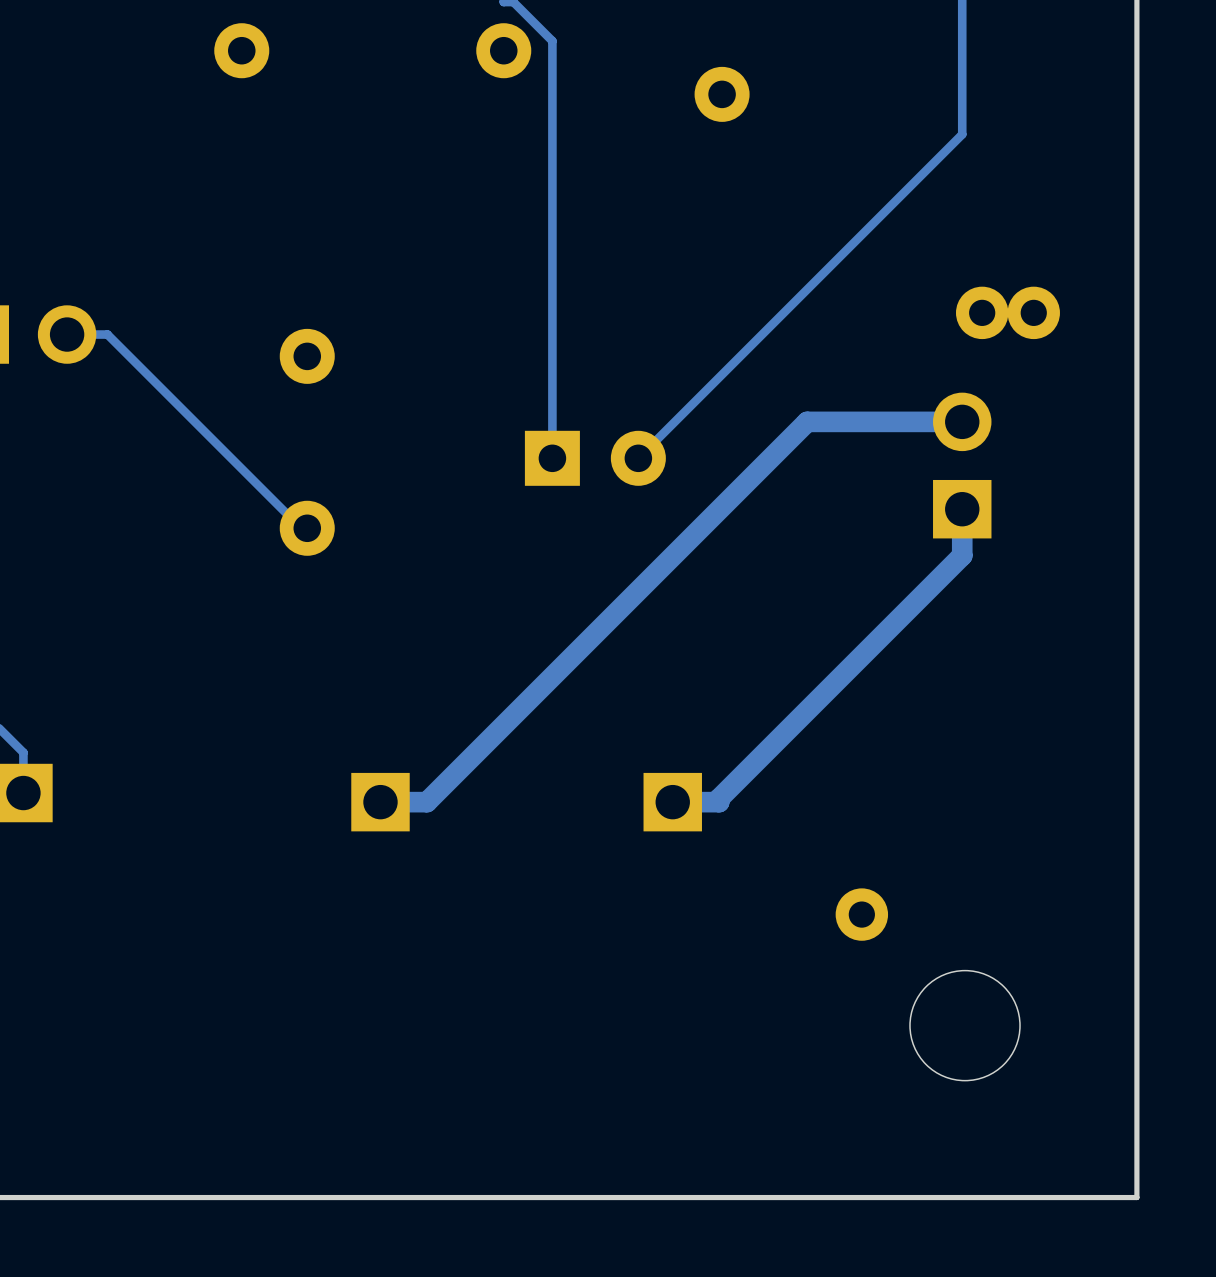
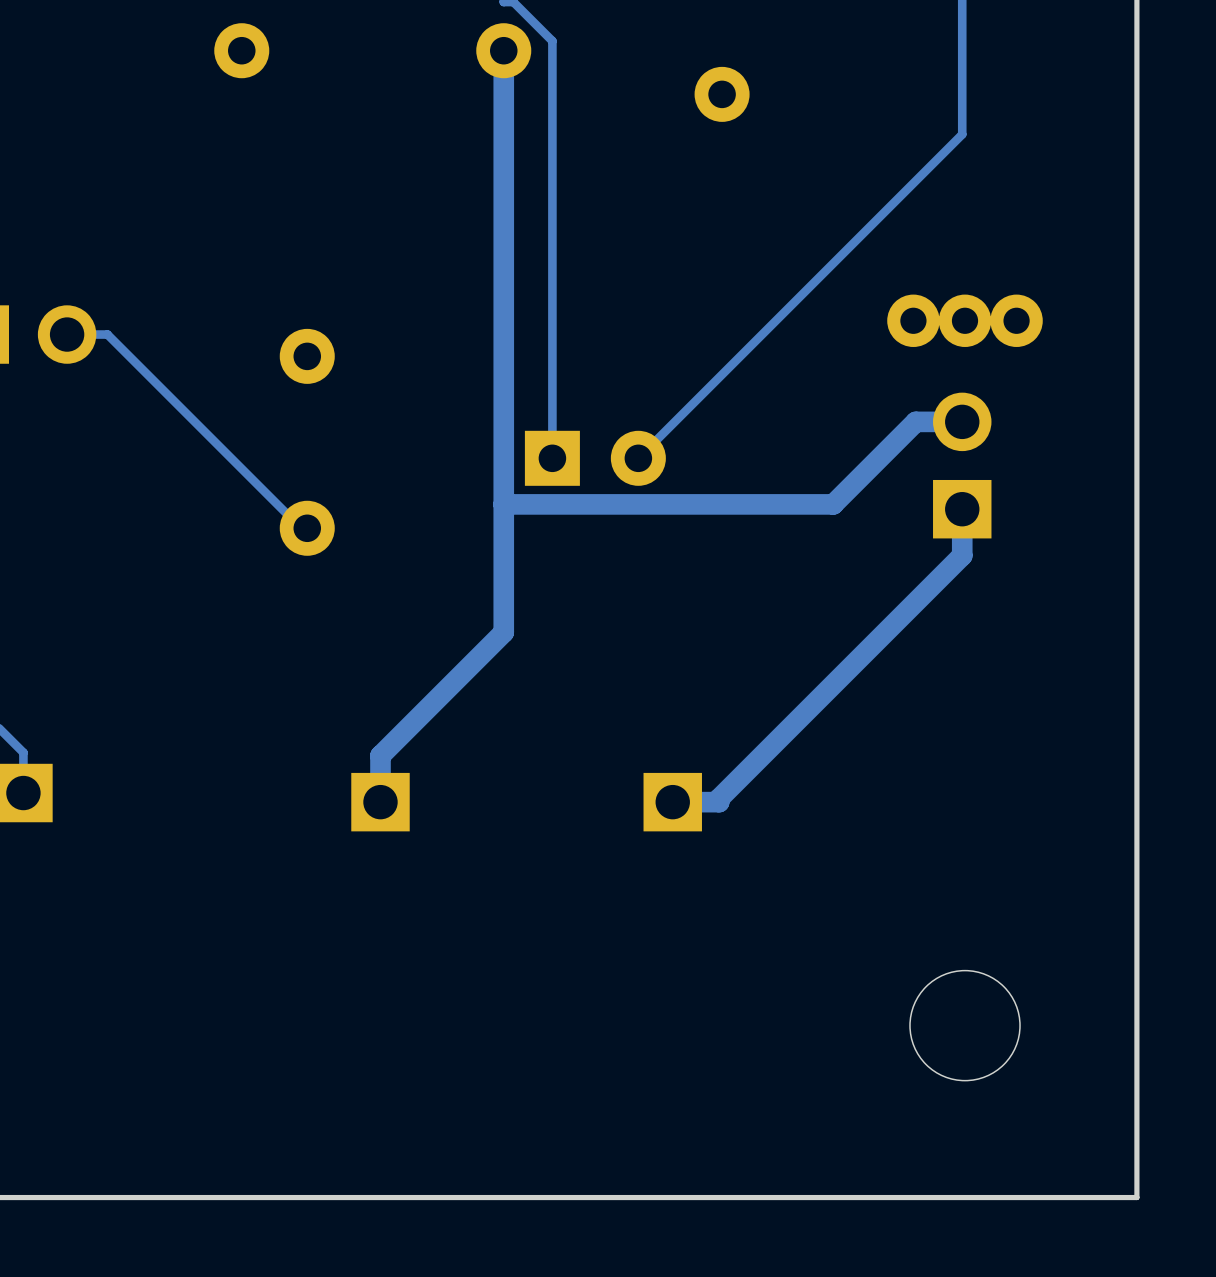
track: none -> (503, 50) (503, 504)
part: (982, 312) -> none
part: (1033, 312) -> none
part: none -> (913, 320)
part: none -> (965, 320)
part: none -> (1016, 320)
track: (915, 421) (807, 421) (426, 802) (380, 802) -> (915, 421) (833, 504) (503, 504)
track: none -> (503, 504) (503, 632) (380, 755) (380, 802)
part: (861, 914) -> none

